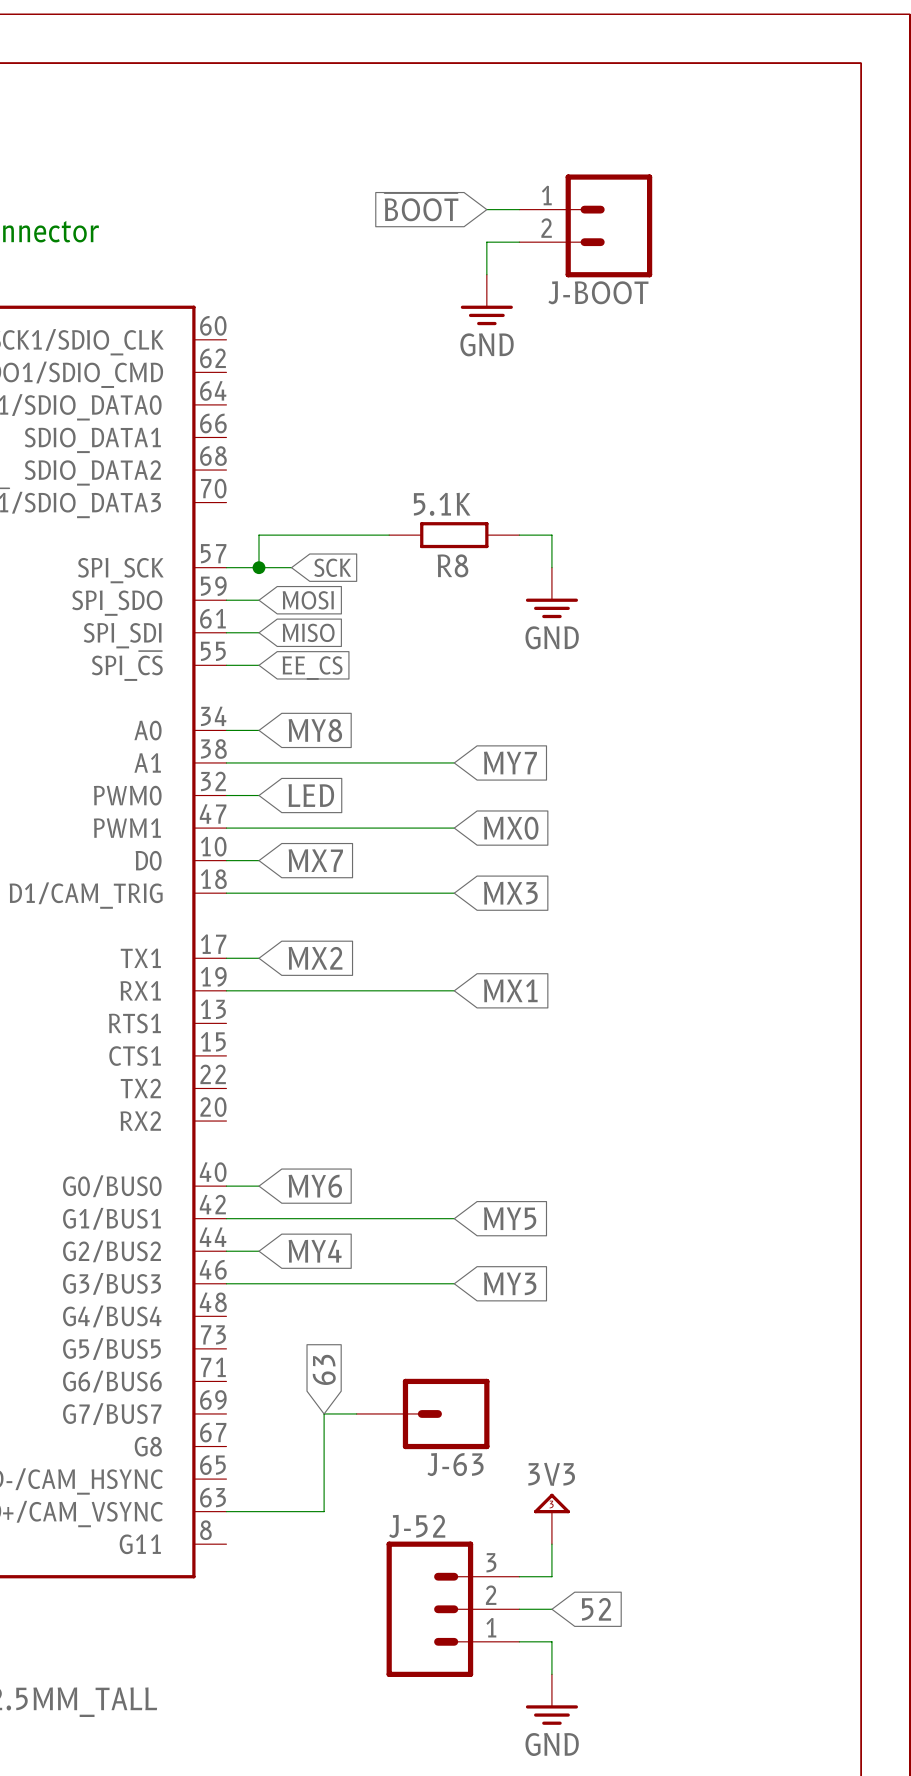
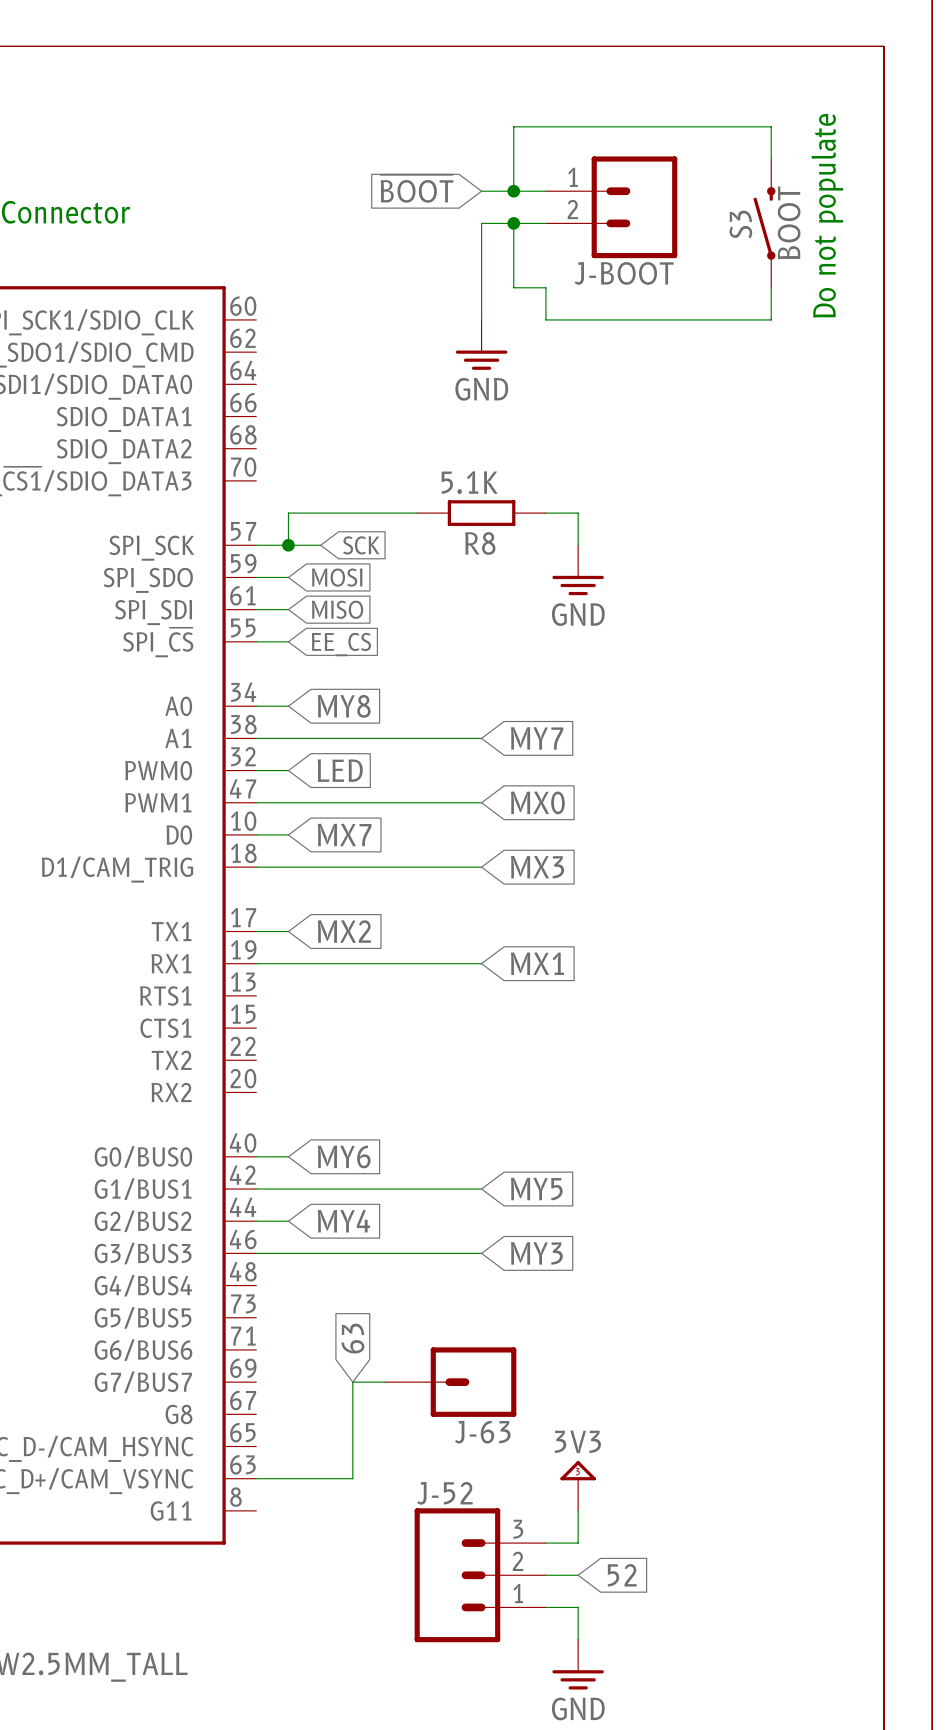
wire: none -> (771, 159) (771, 126) (513, 126) (513, 191) (481, 191)
global label position: ~{BOOT} (421, 207) -> ~{BOOT} (416, 188)
junction: none -> (513, 191)
text: none -> Do not populate (827, 215)
wire: none -> (513, 223) (481, 223) (481, 319)
junction: none -> (513, 223)
S3: none -> BOOT (764, 223)
wire: none -> (513, 255) (513, 287) (545, 287) (545, 319) (771, 319) (771, 287)
power symbol position: GND (486, 299) -> GND (481, 344)

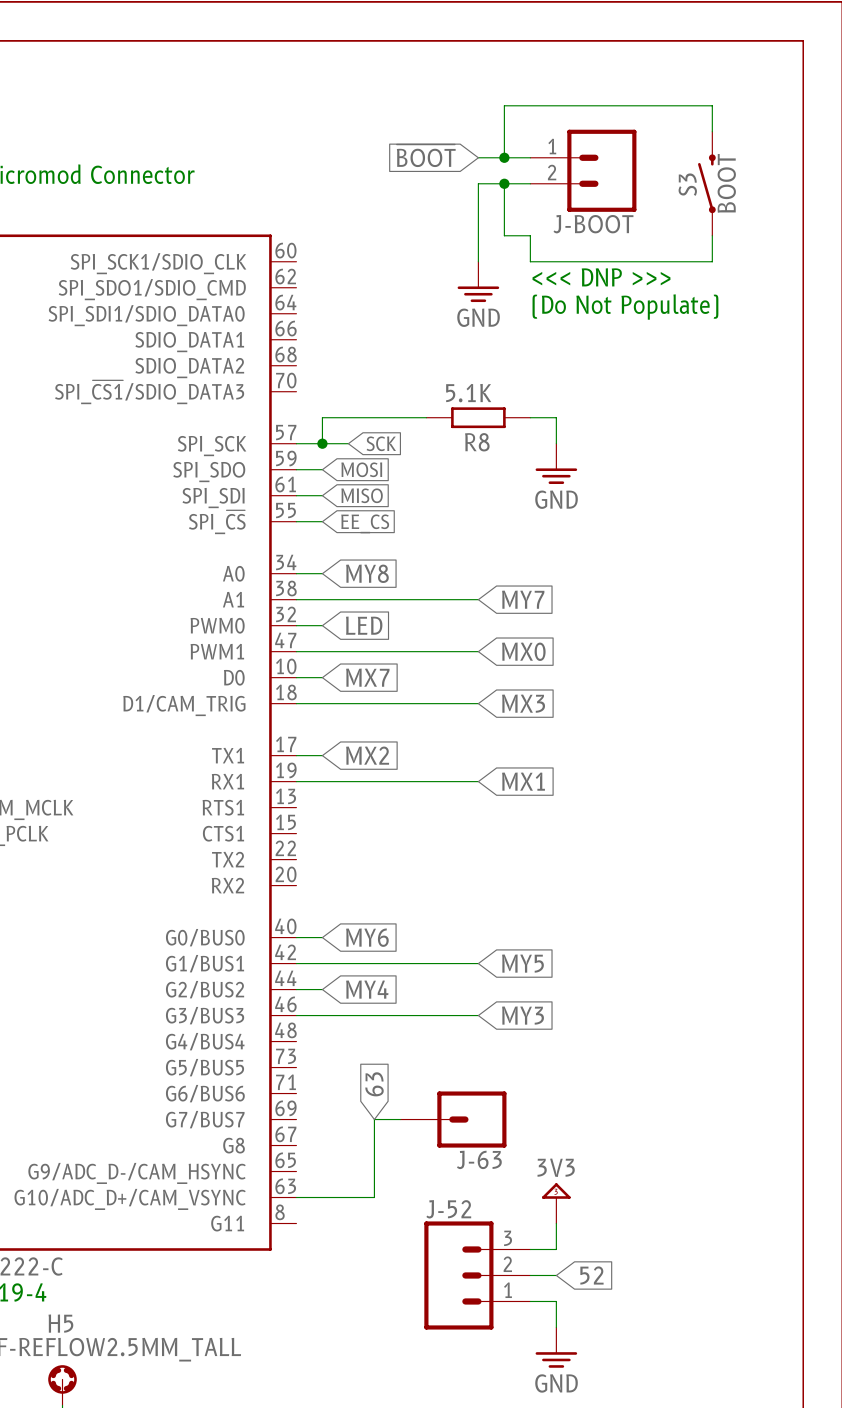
text: Do not populate (827, 215) -> none
text: none -> <<< DNP >>> (601, 277)
text: none -> (Do Not Populate) (625, 307)

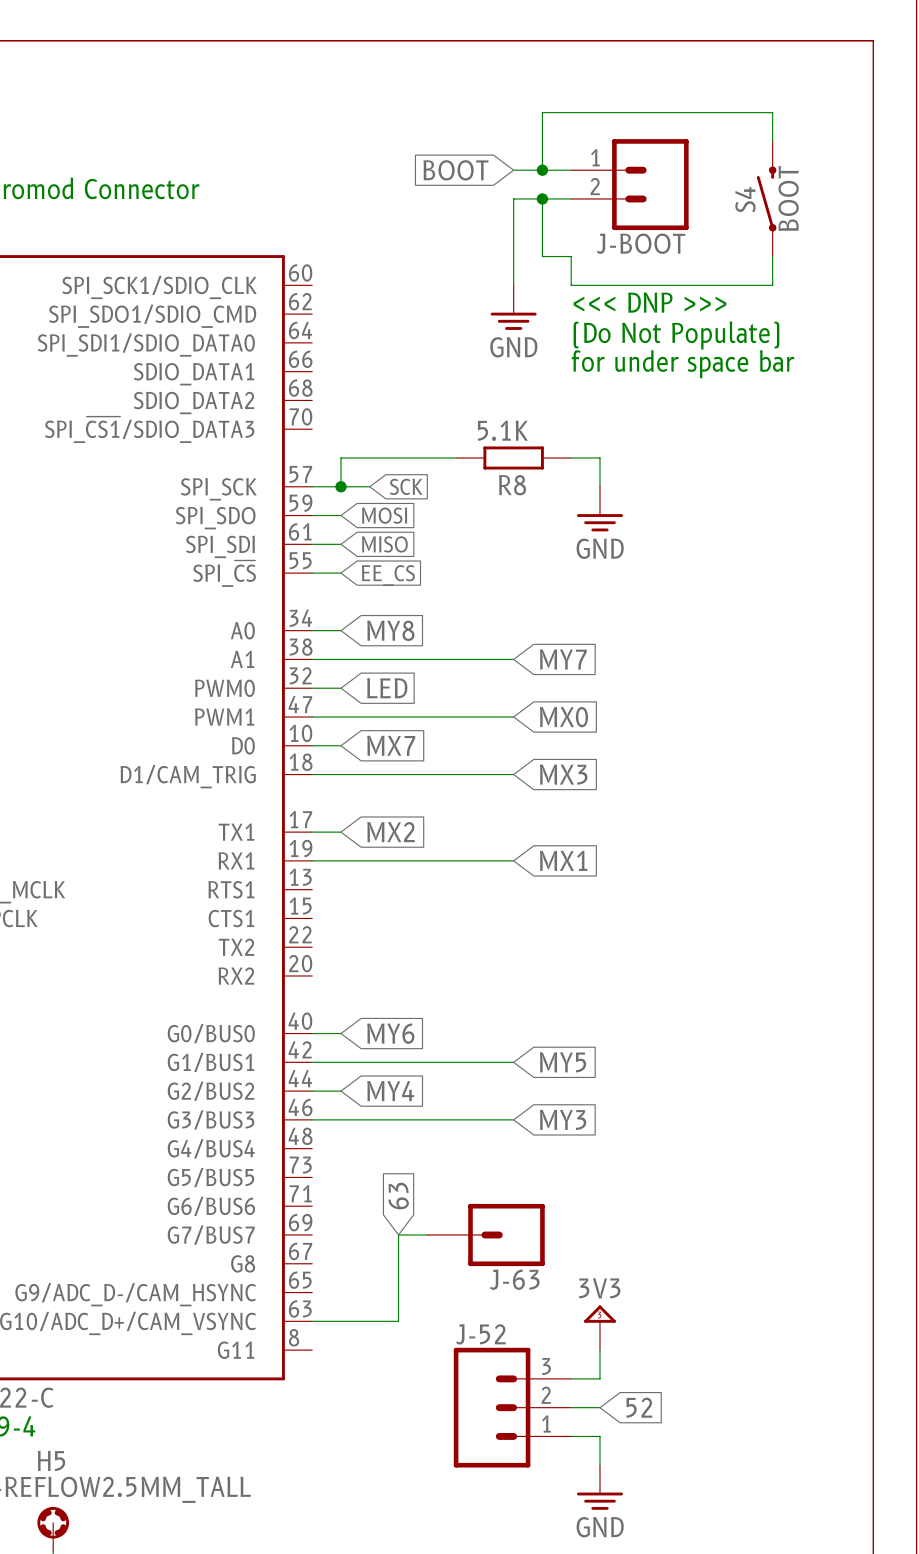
global label: ~{BOOT} (426, 155) -> BOOT (455, 170)
S3 name: S3 (687, 184) -> S4 (745, 199)
text: none -> for under space bar (683, 364)

